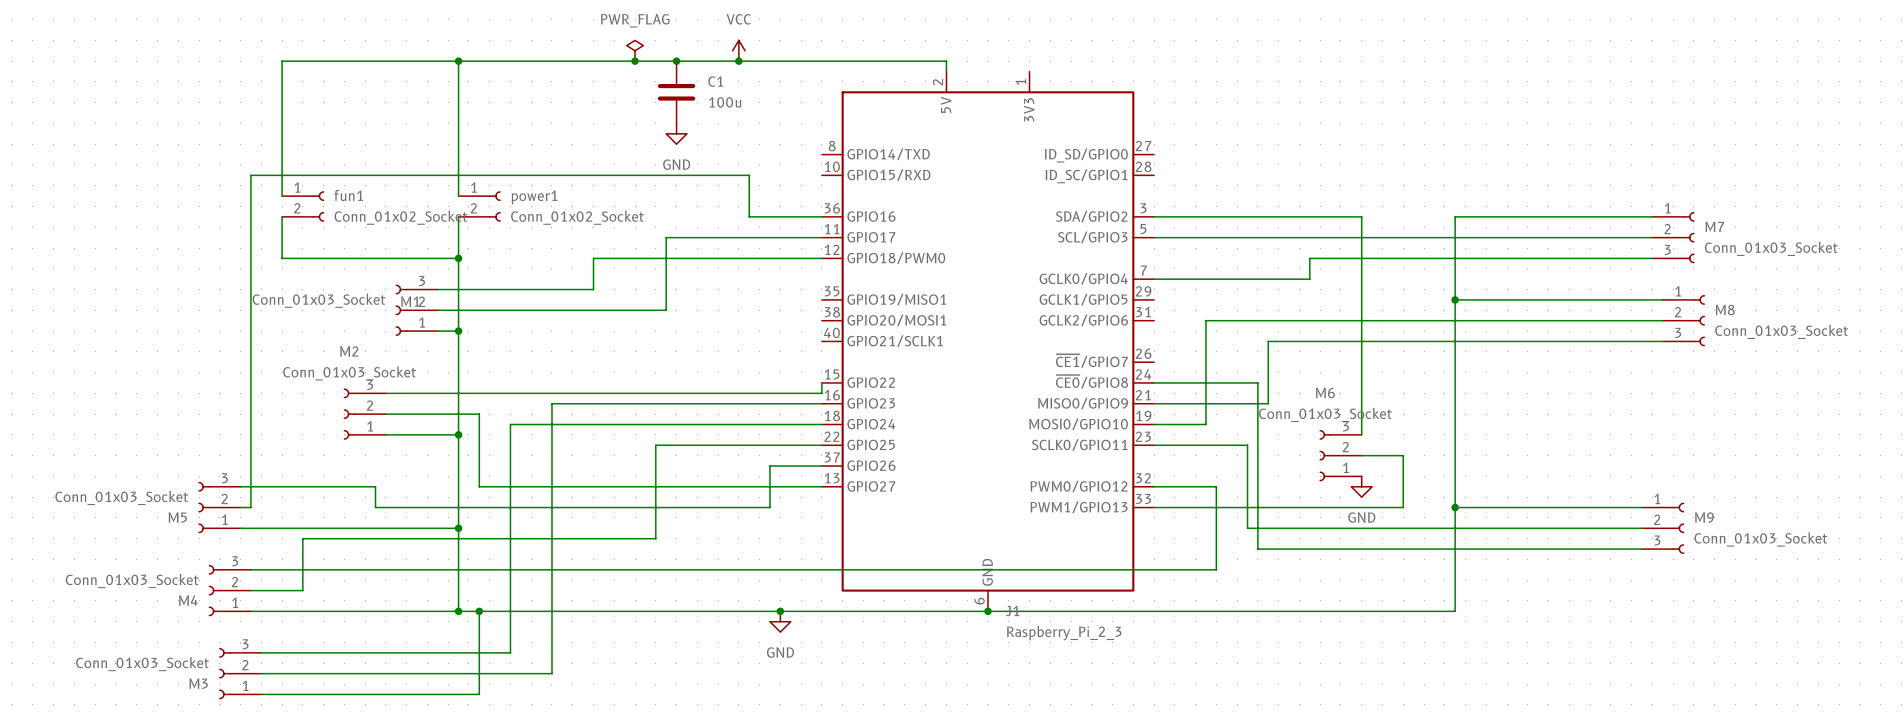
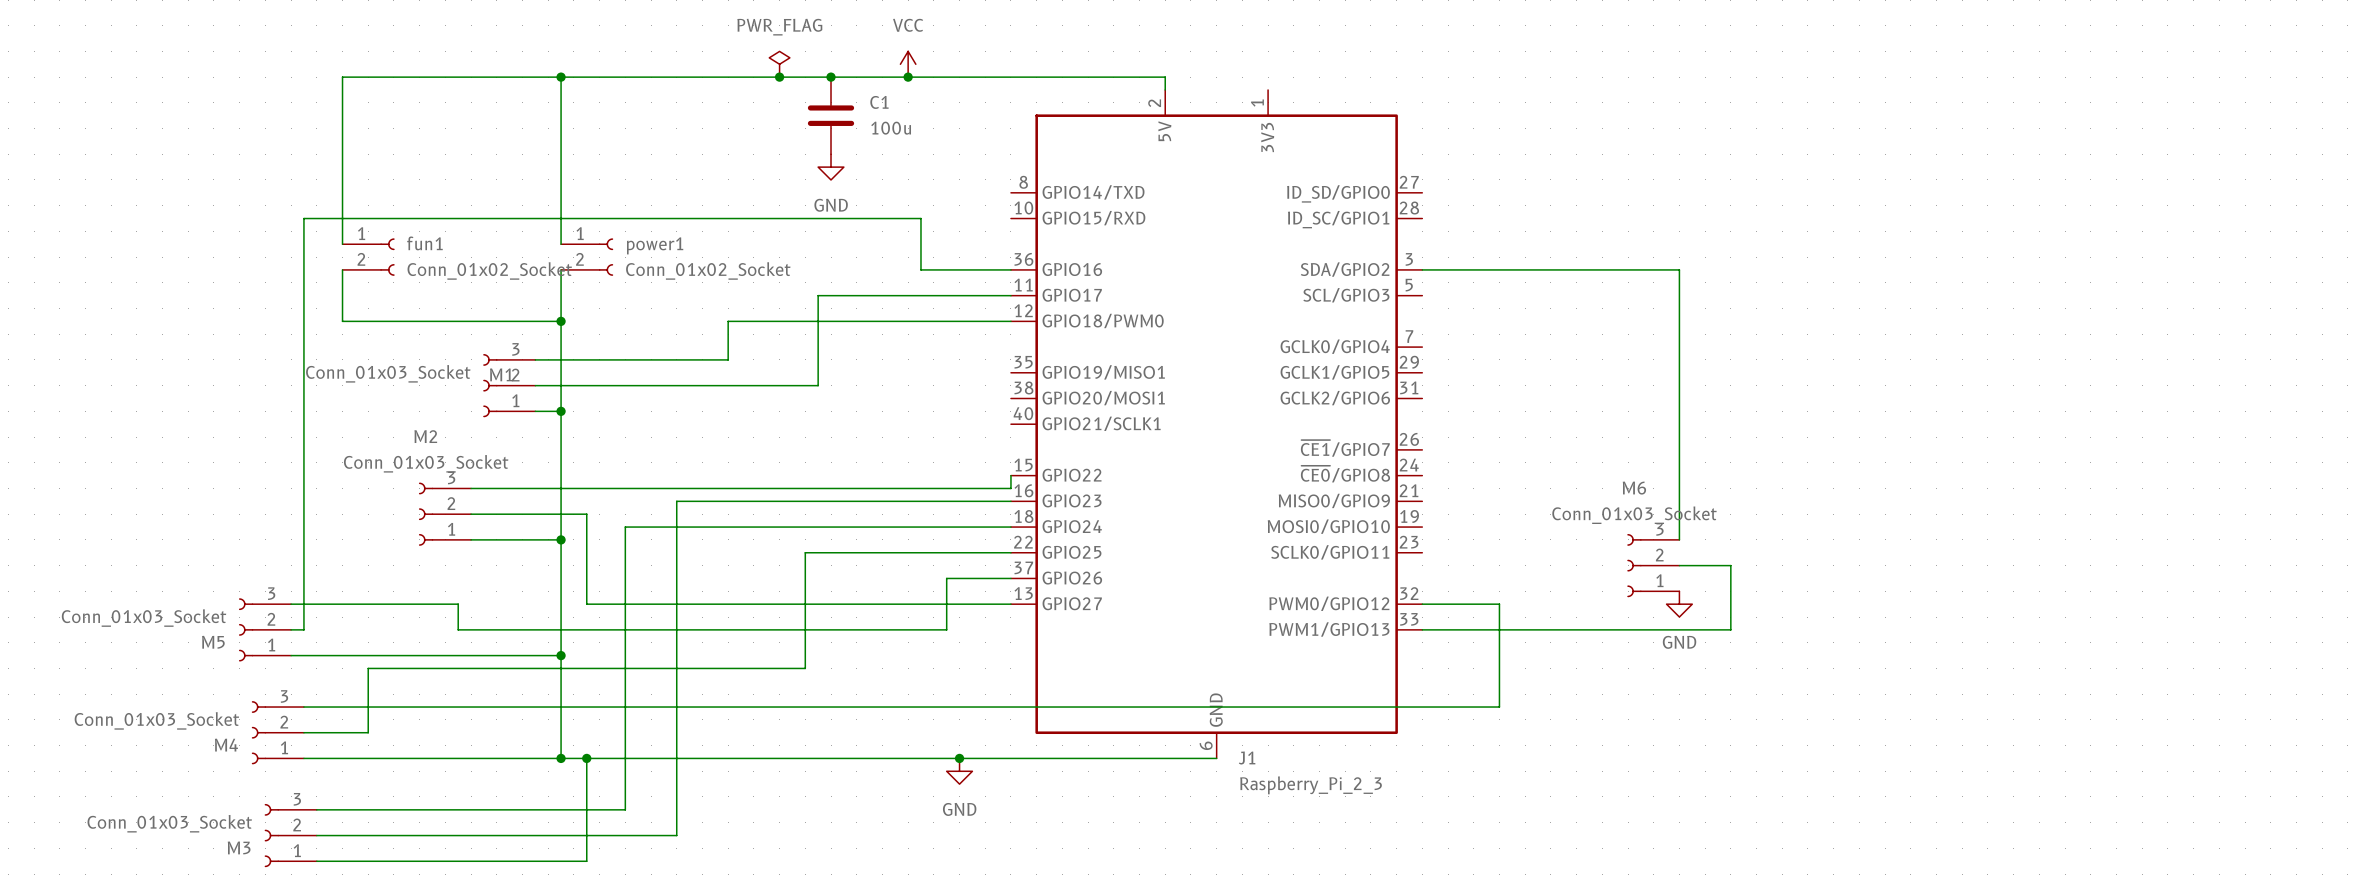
wire: (1652, 216) (1455, 216) (1455, 611) (987, 611) -> none
wire: (1154, 237) (1652, 237) -> none
M7: Conn_01x03_Socket (1673, 237) -> none
wire: (1652, 258) (1309, 258) (1309, 279) (1154, 279) -> none
wire: (1455, 299) (1662, 299) -> none
junction: (1455, 299) -> none
wire: (1662, 320) (1205, 320) (1205, 424) (1154, 424) -> none
M8: Conn_01x03_Socket (1683, 320) -> none
wire: (1662, 341) (1268, 341) (1268, 403) (1154, 403) -> none
wire: (1154, 382) (1257, 382) (1257, 549) (1642, 549) -> none
wire: (1154, 445) (1247, 445) (1247, 528) (1642, 528) -> none
wire: (1455, 507) (1642, 507) -> none
junction: (1455, 507) -> none
M9: Conn_01x03_Socket (1663, 528) -> none
junction: (987, 611) -> none

